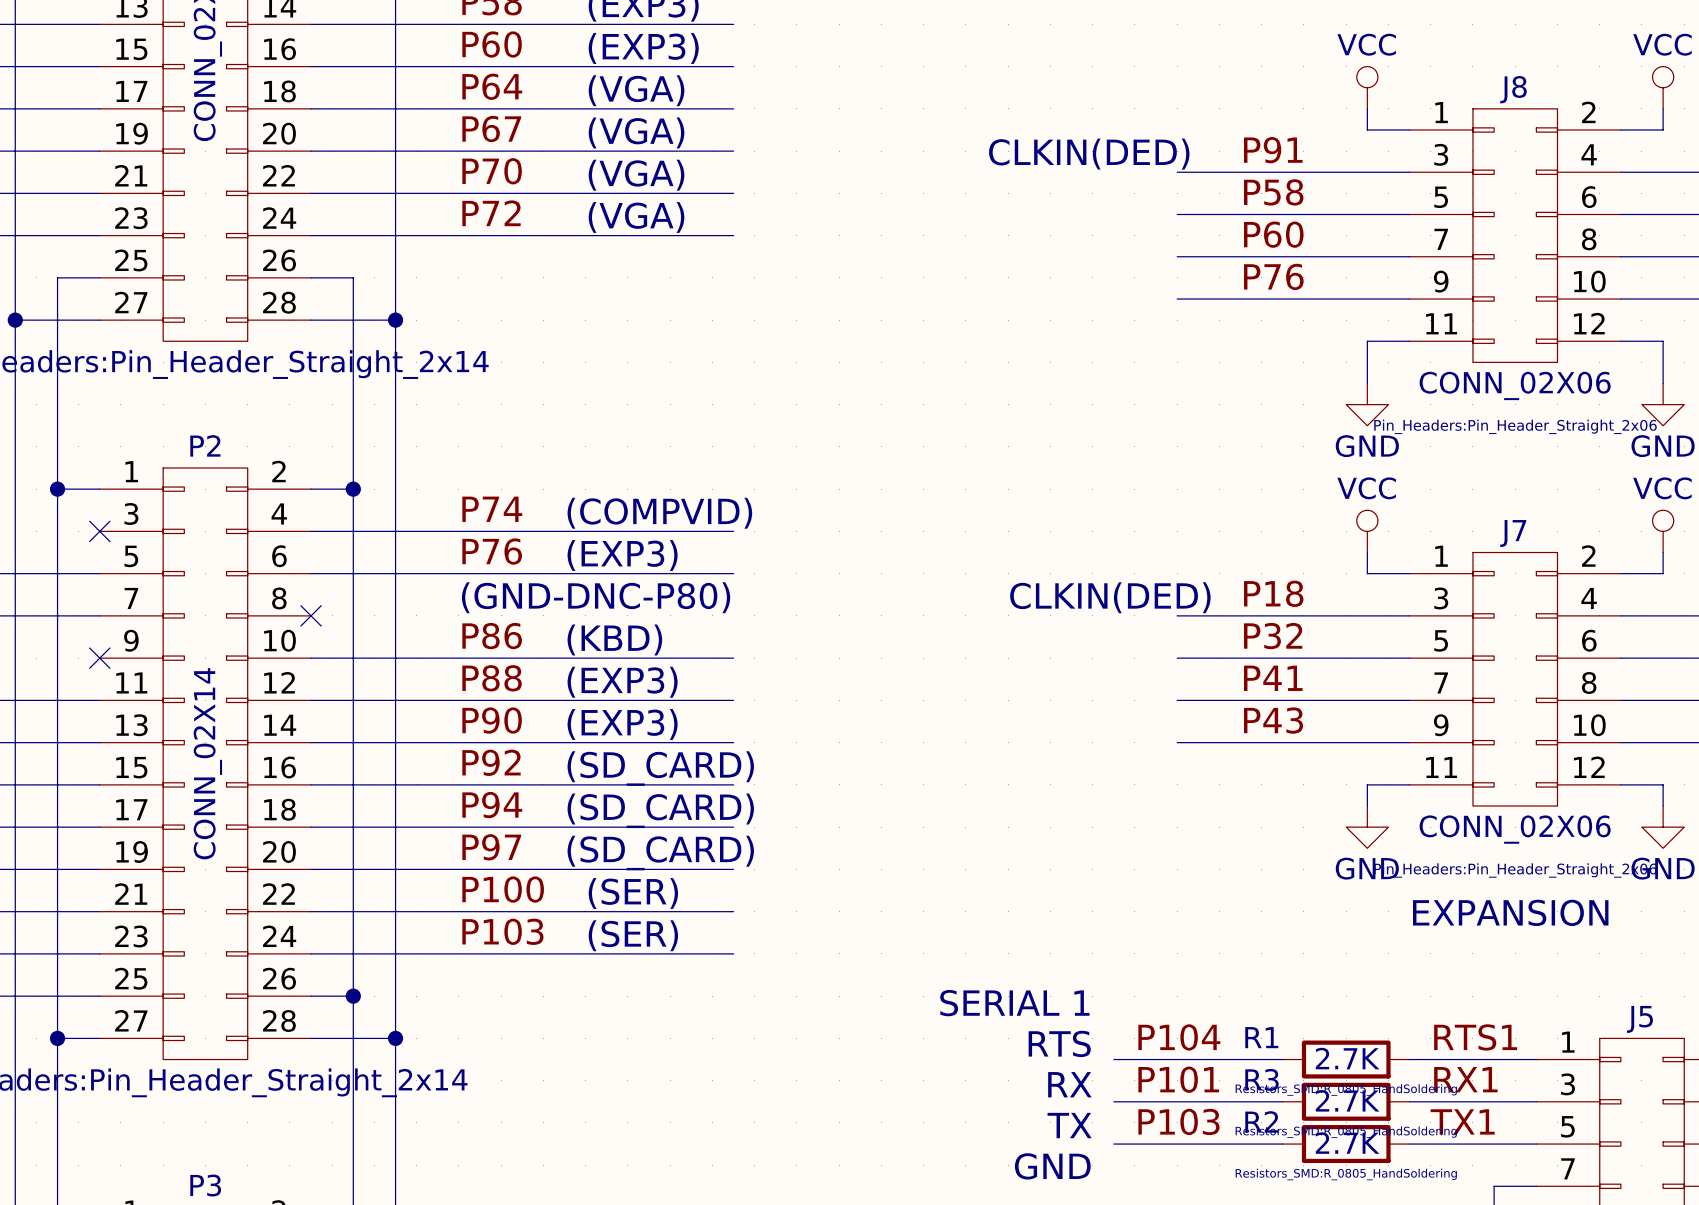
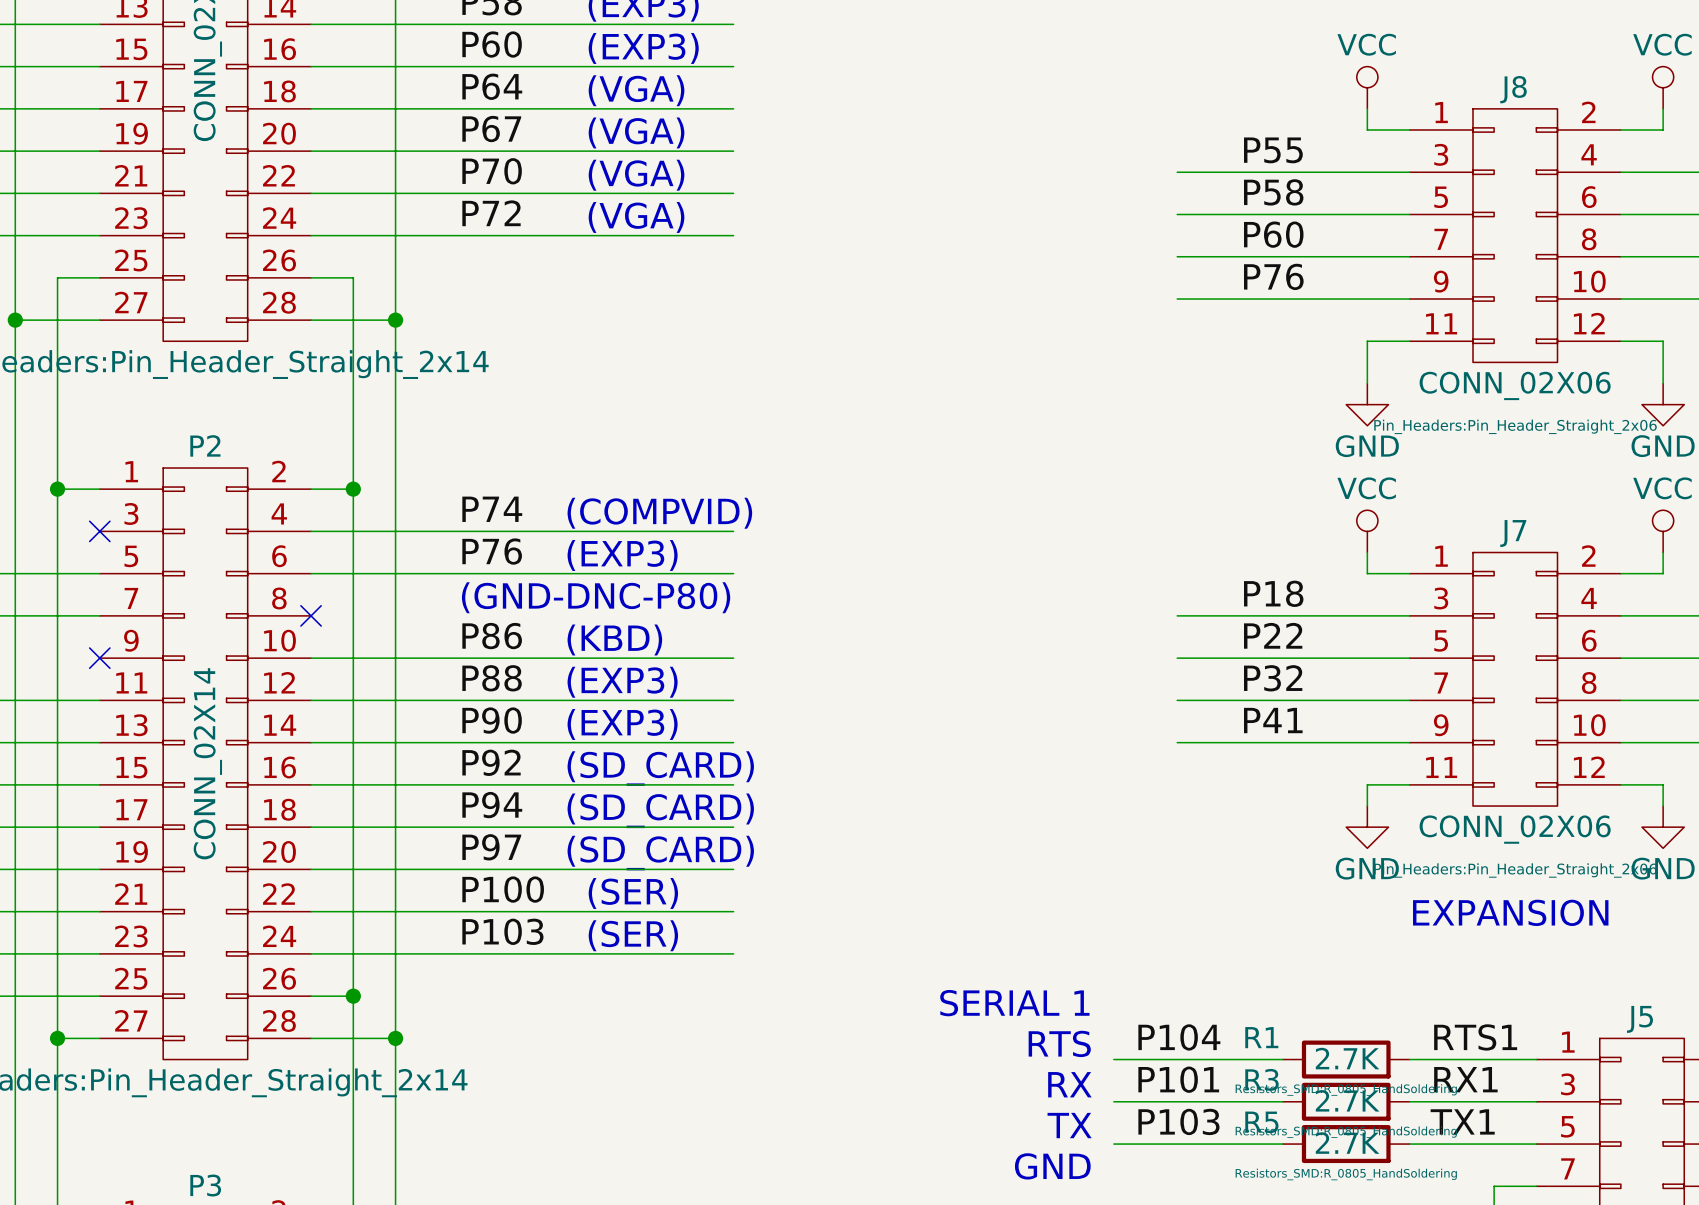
label: P91 (1273, 150) -> P55 (1273, 150)
text: CLKIN(DED) (1089, 154) -> none
text: CLKIN(DED) (1110, 597) -> none
label: P32 (1273, 636) -> P22 (1273, 635)
label: P41 (1273, 678) -> P32 (1273, 678)
label: P43 (1273, 720) -> P41 (1273, 720)
R2 name: R2 (1261, 1121) -> R5 (1261, 1122)

